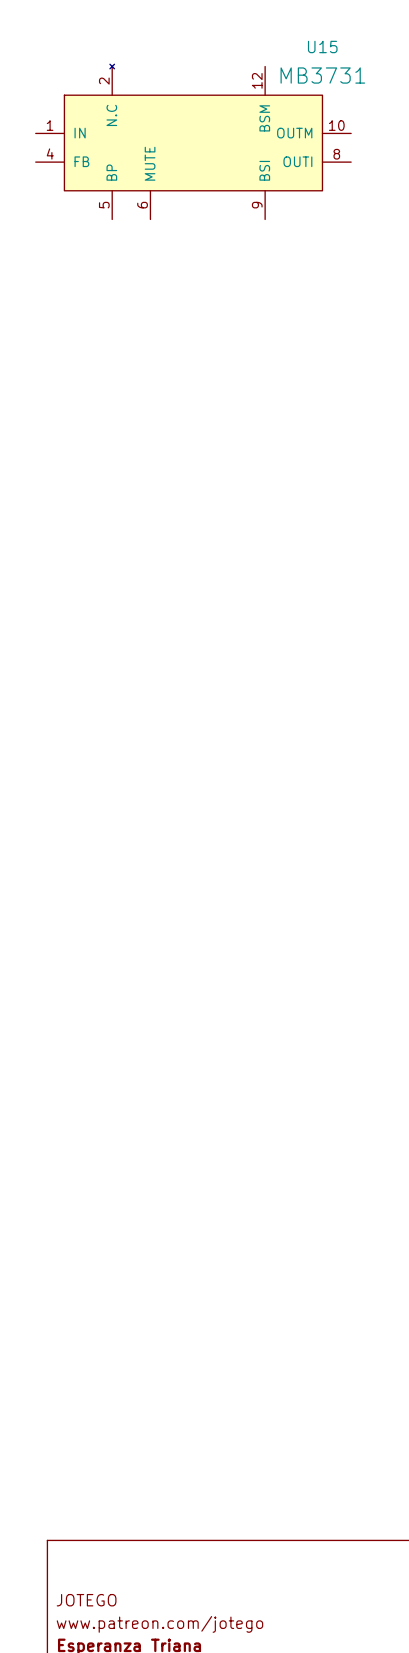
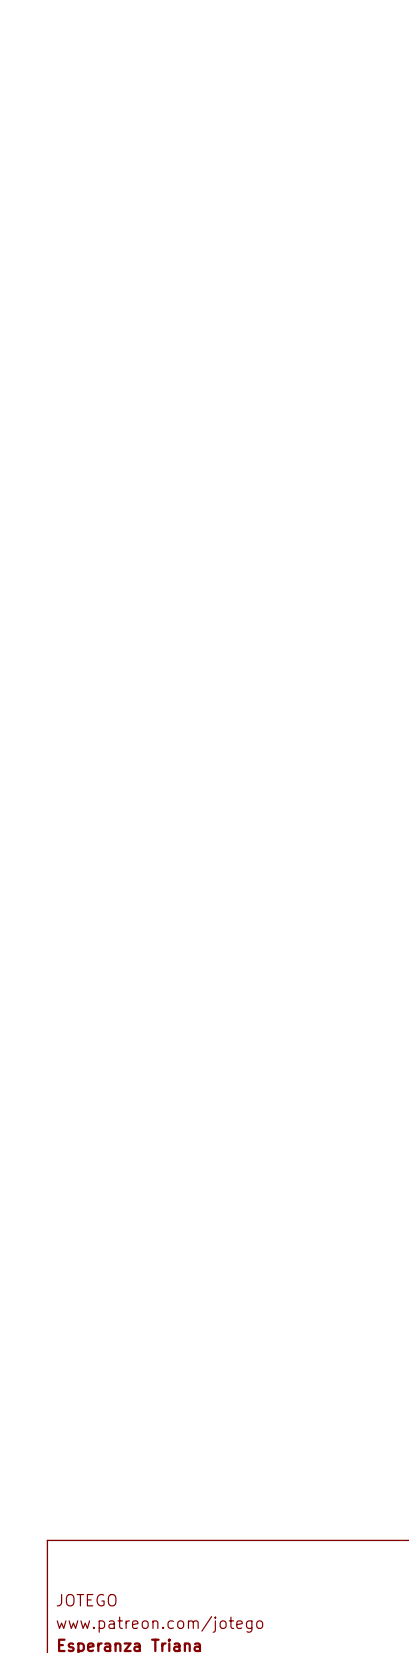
U15: MB3731 (193, 141) -> none

